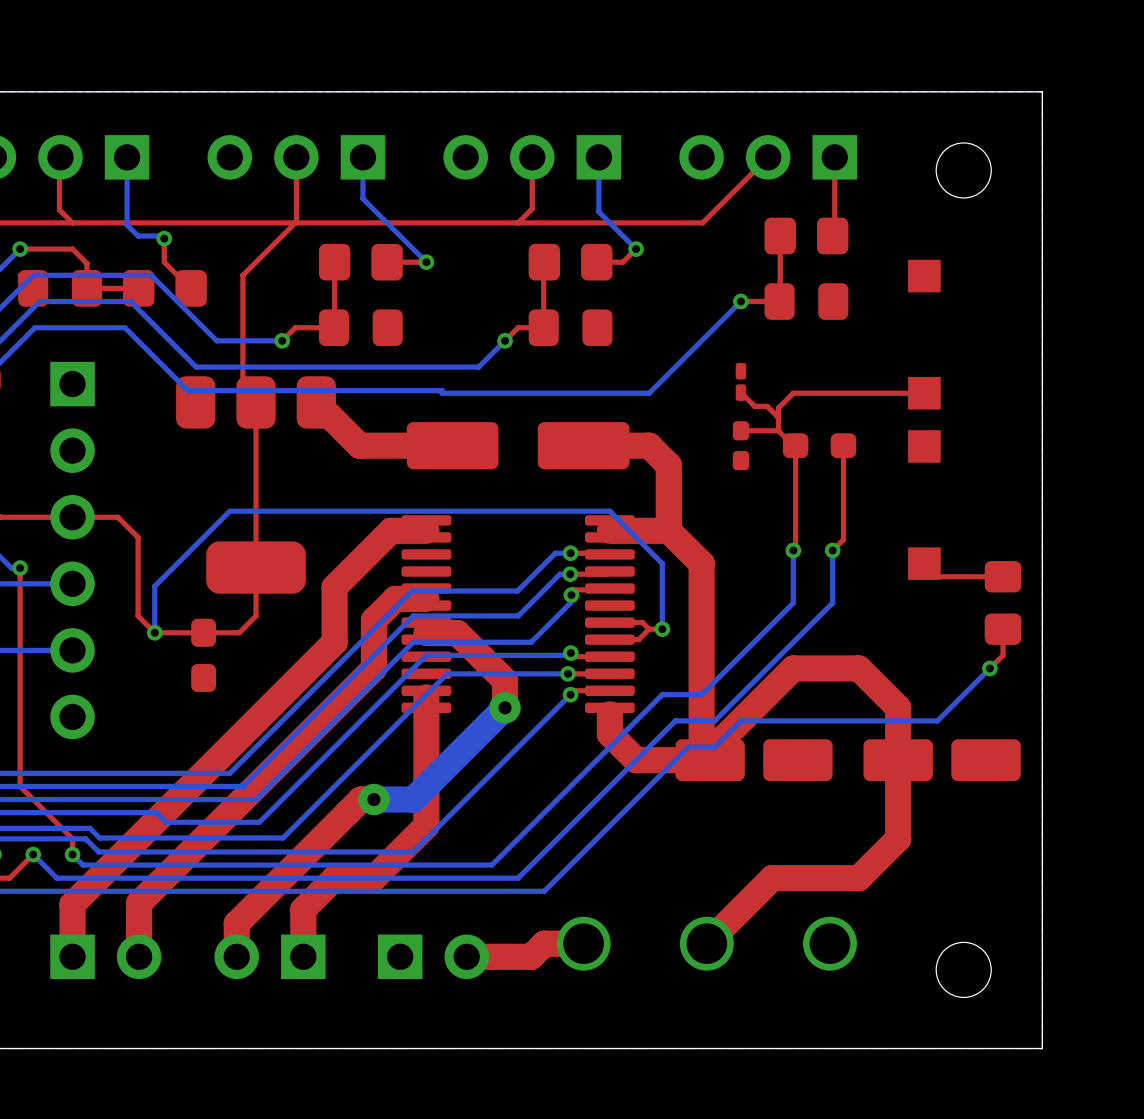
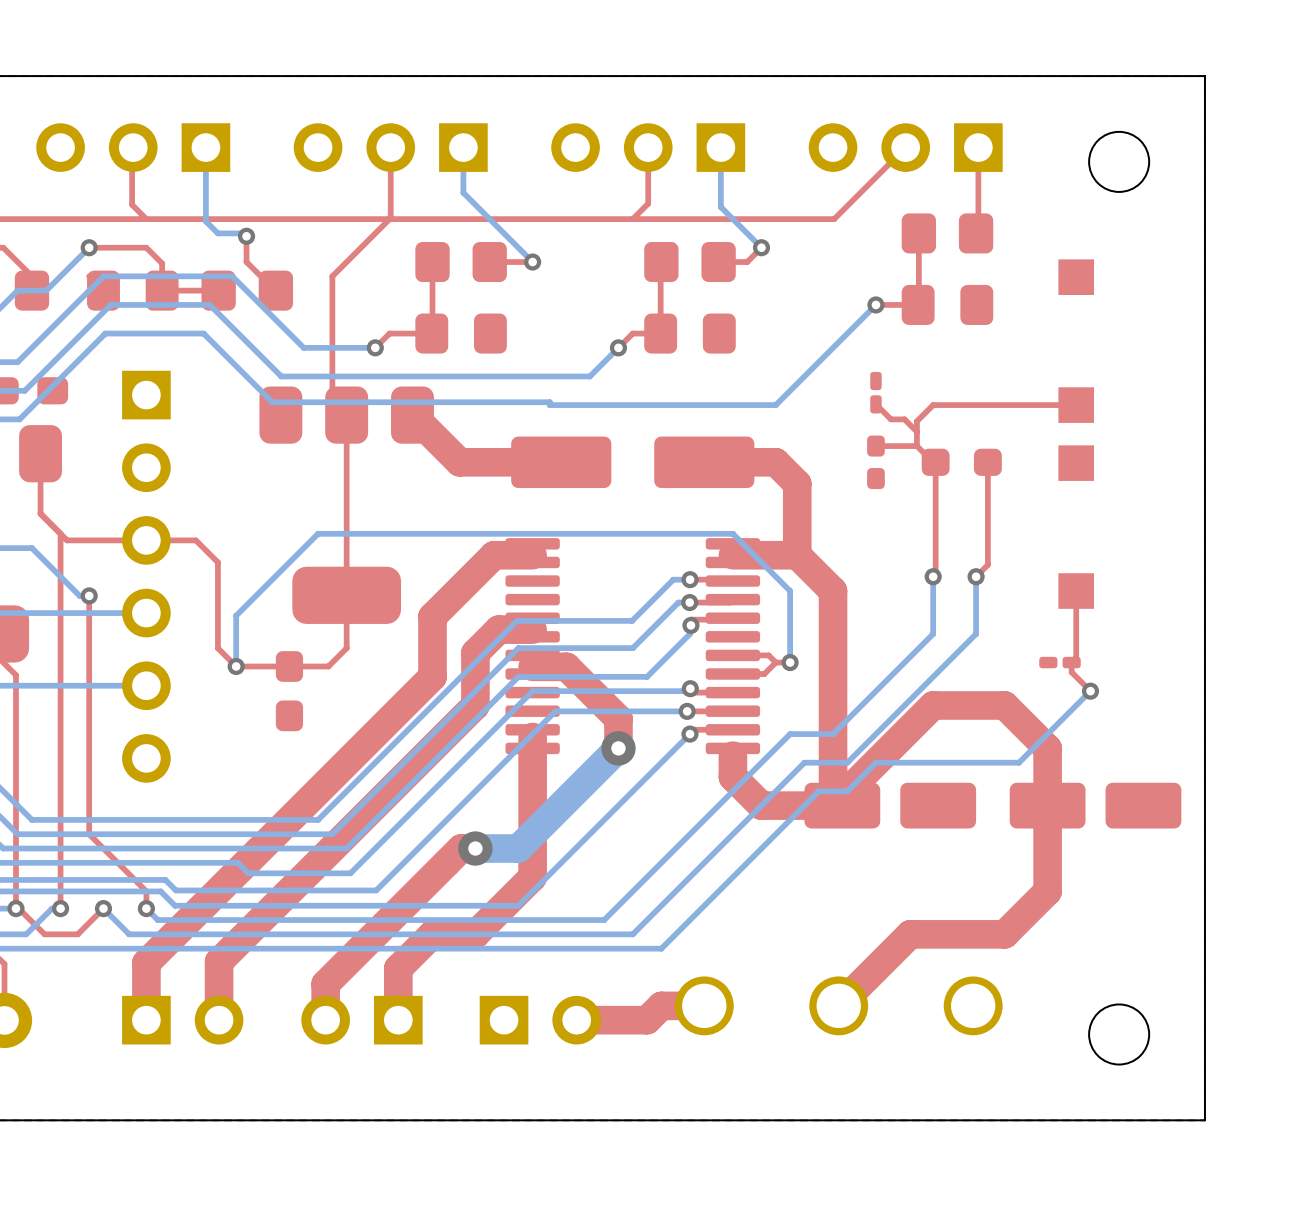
top track: (1003, 563) (1003, 576) (937, 576) (924, 563) -> (1090, 691) (1071, 672) (1071, 662) (1076, 657) (1076, 591)
part: (1003, 602) -> none
part: none -> (1059, 662)
top track: (1003, 629) (1003, 655) (989, 668) -> none
bottom track: (989, 668) (937, 720) (871, 720) -> (1090, 691) (1019, 762)
via position: (989, 668) -> (1090, 691)

